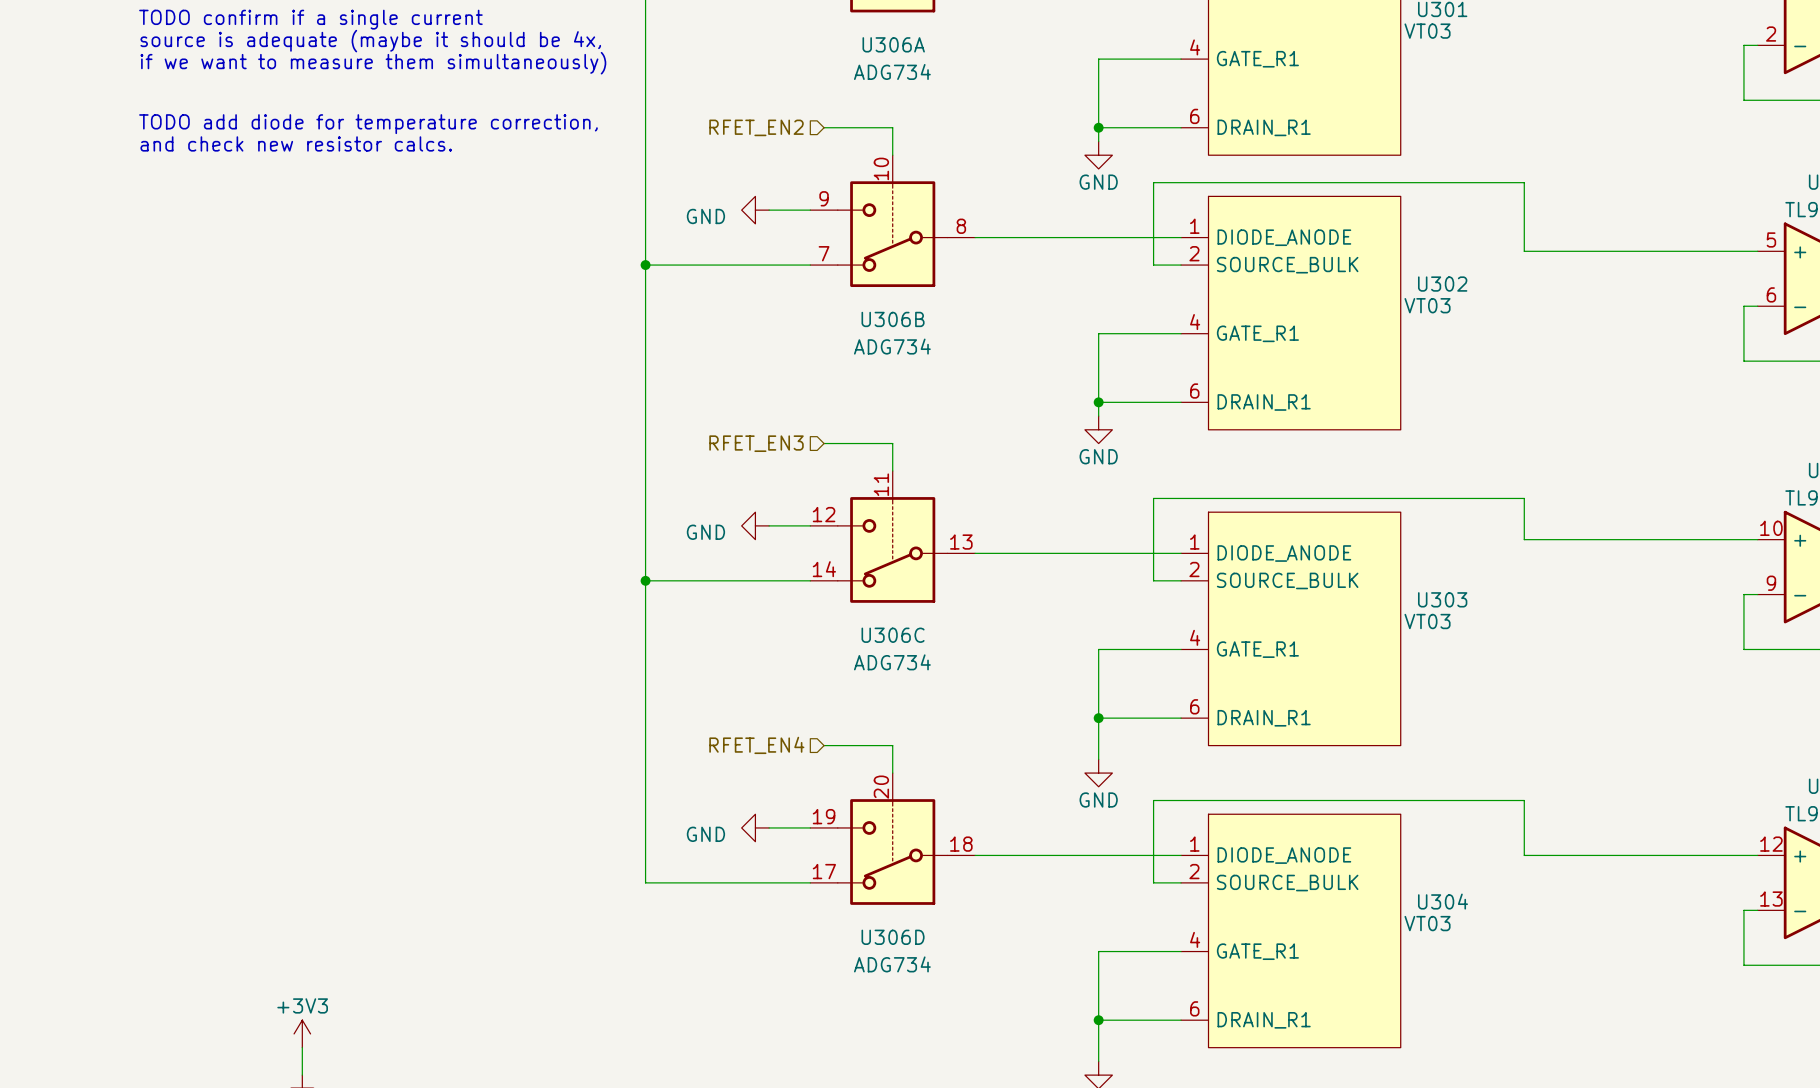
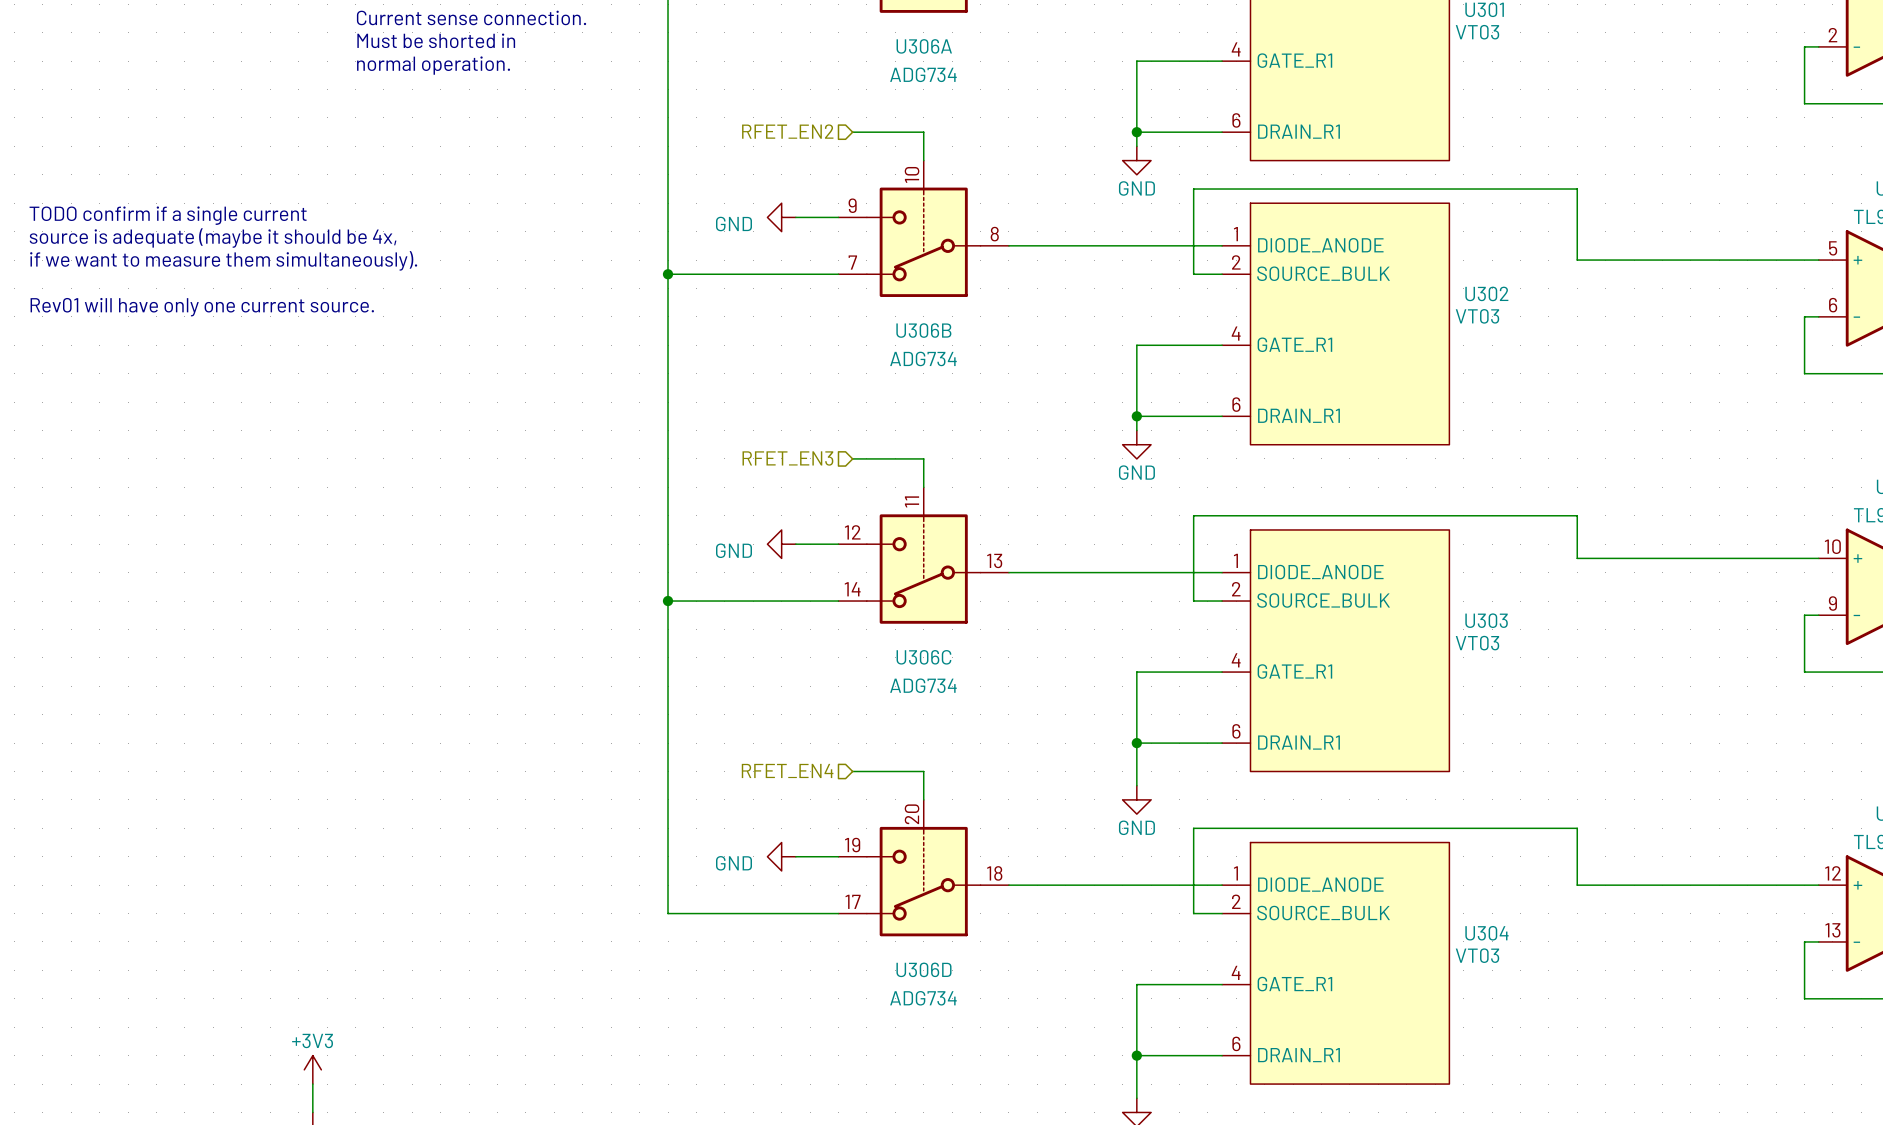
text: none -> Current sense connection. (471, 17)
text position: TODO confirm if a single current (310, 19) -> TODO confirm if a single current (168, 215)
text: none -> Must be shorted in (436, 40)
text position: source is adequate (maybe it should be 4x, (370, 41) -> source is adequate (maybe it should be 4x, (213, 238)
text: if we want to measure them simultaneously) (373, 63) -> none
text: none -> normal operation. (433, 65)
text: TODO add diode for temperature correction, (368, 124) -> none
text: and check new resistor calcs. (296, 143) -> none
text: none -> if we want to measure them simultaneously). (223, 260)
text: none -> Rev01 will have only one current source. (202, 307)

